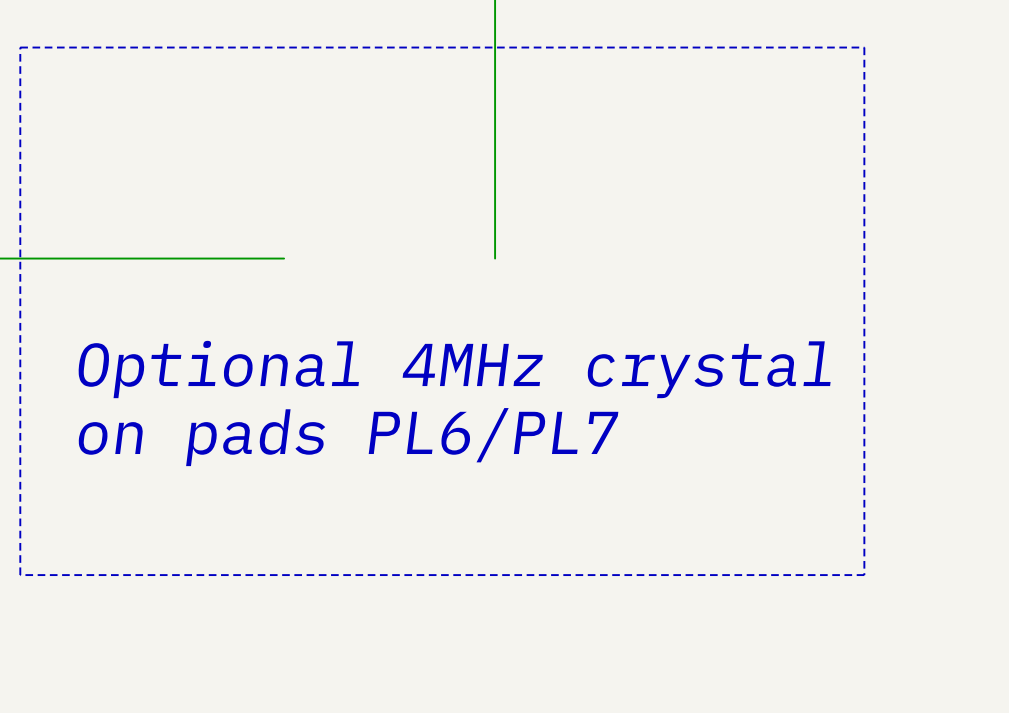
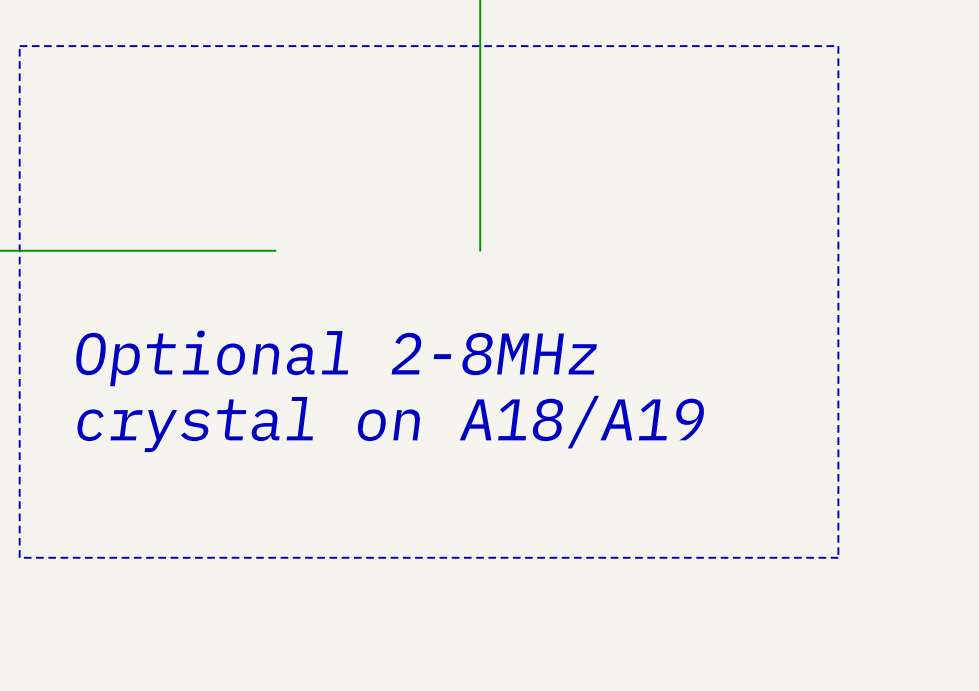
text: Optional 4MHz crystal (454, 369) -> Optional 2-8MHz (336, 358)
text: on pads PL6/PL7 (348, 437) -> crystal on A18/A19 (390, 423)

